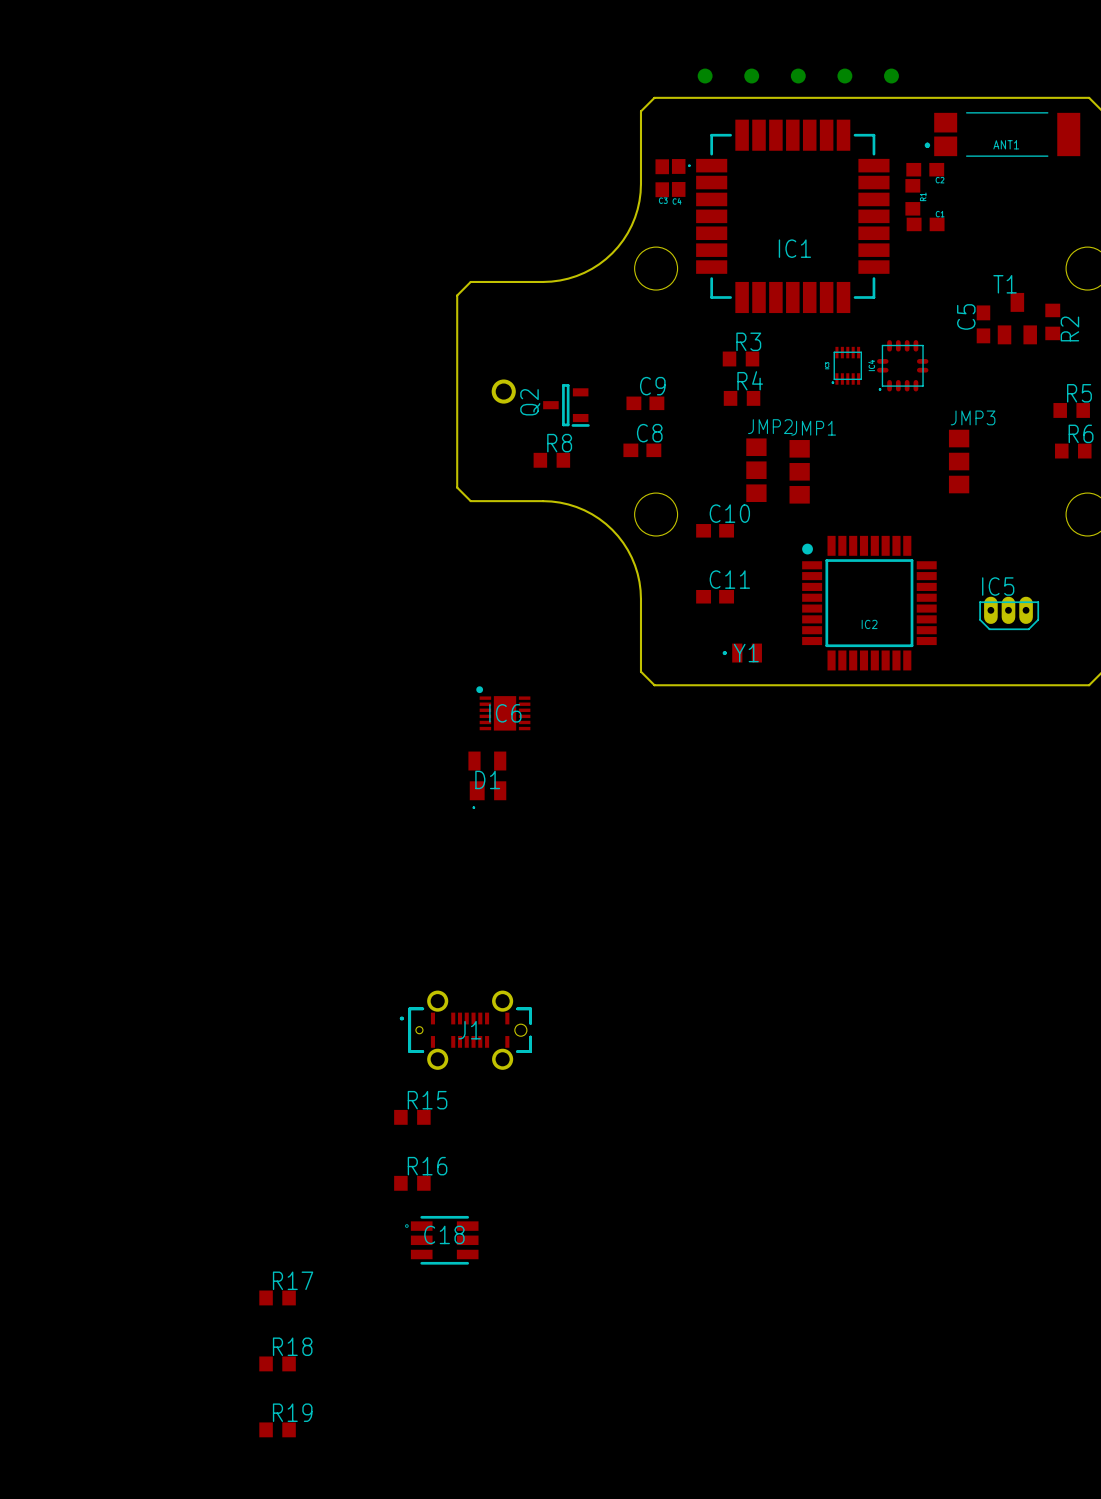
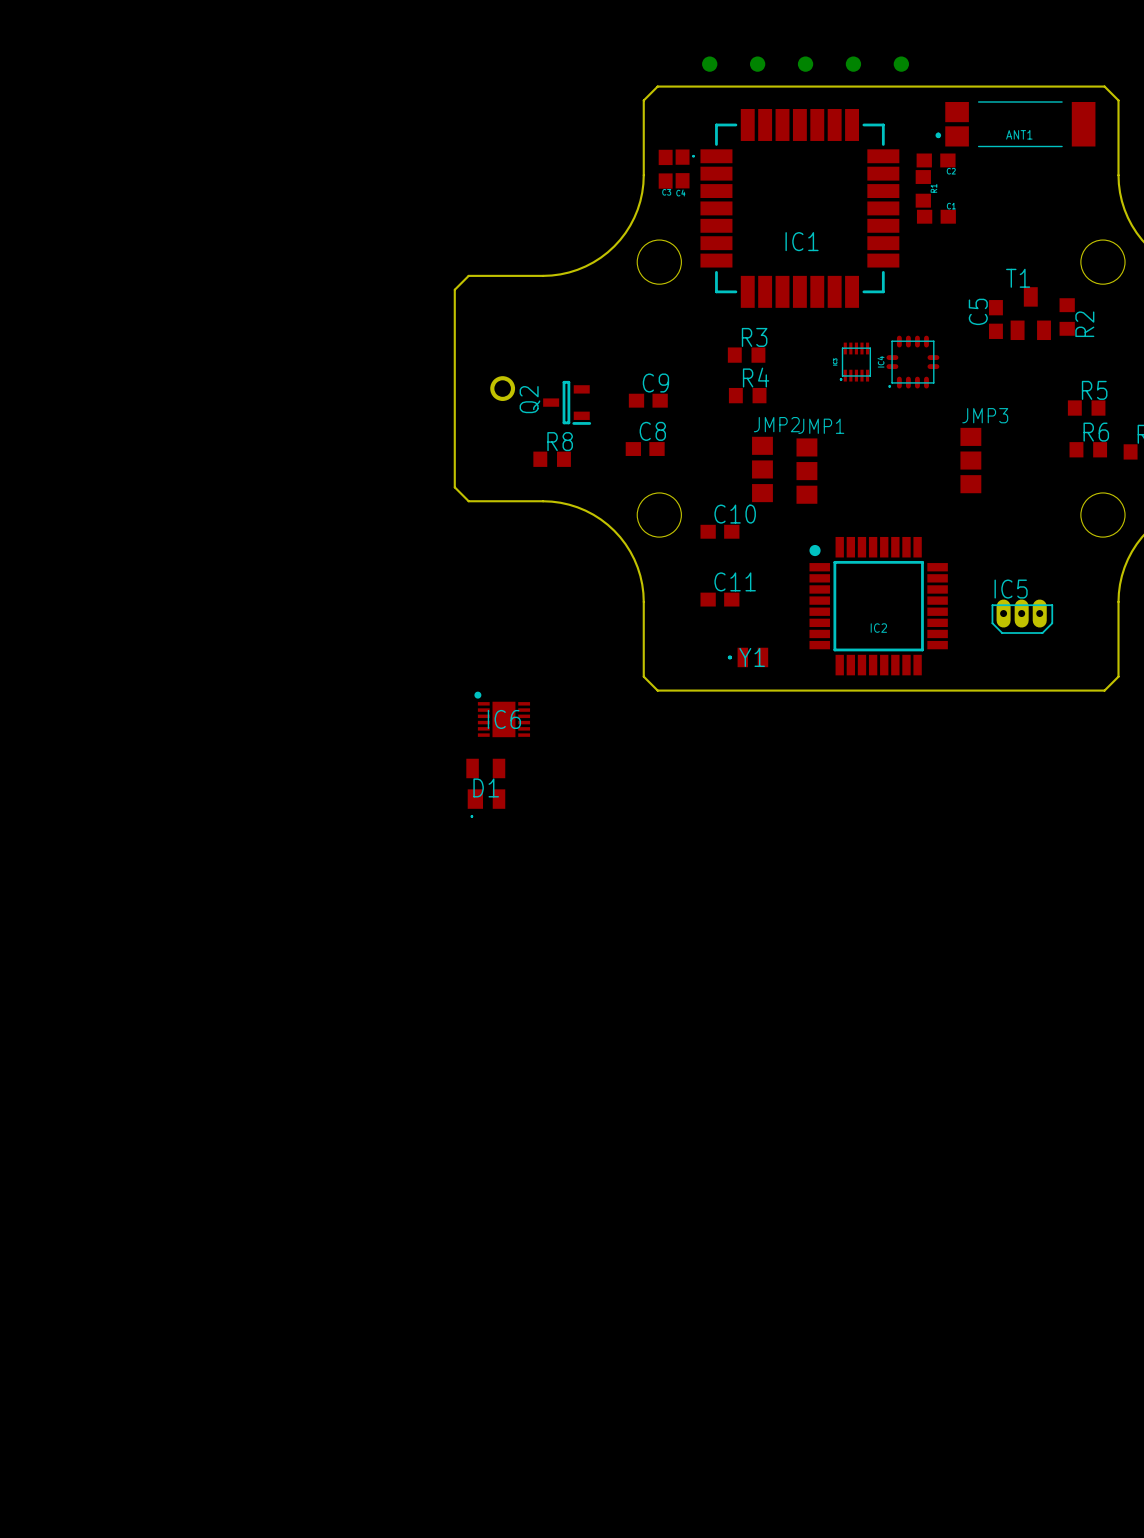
J1: (465, 1030) -> none
R15: (412, 1117) -> none
R16: (412, 1183) -> none
C18: (441, 1240) -> none
R17: (277, 1297) -> none
R18: (277, 1363) -> none
R19: (277, 1429) -> none

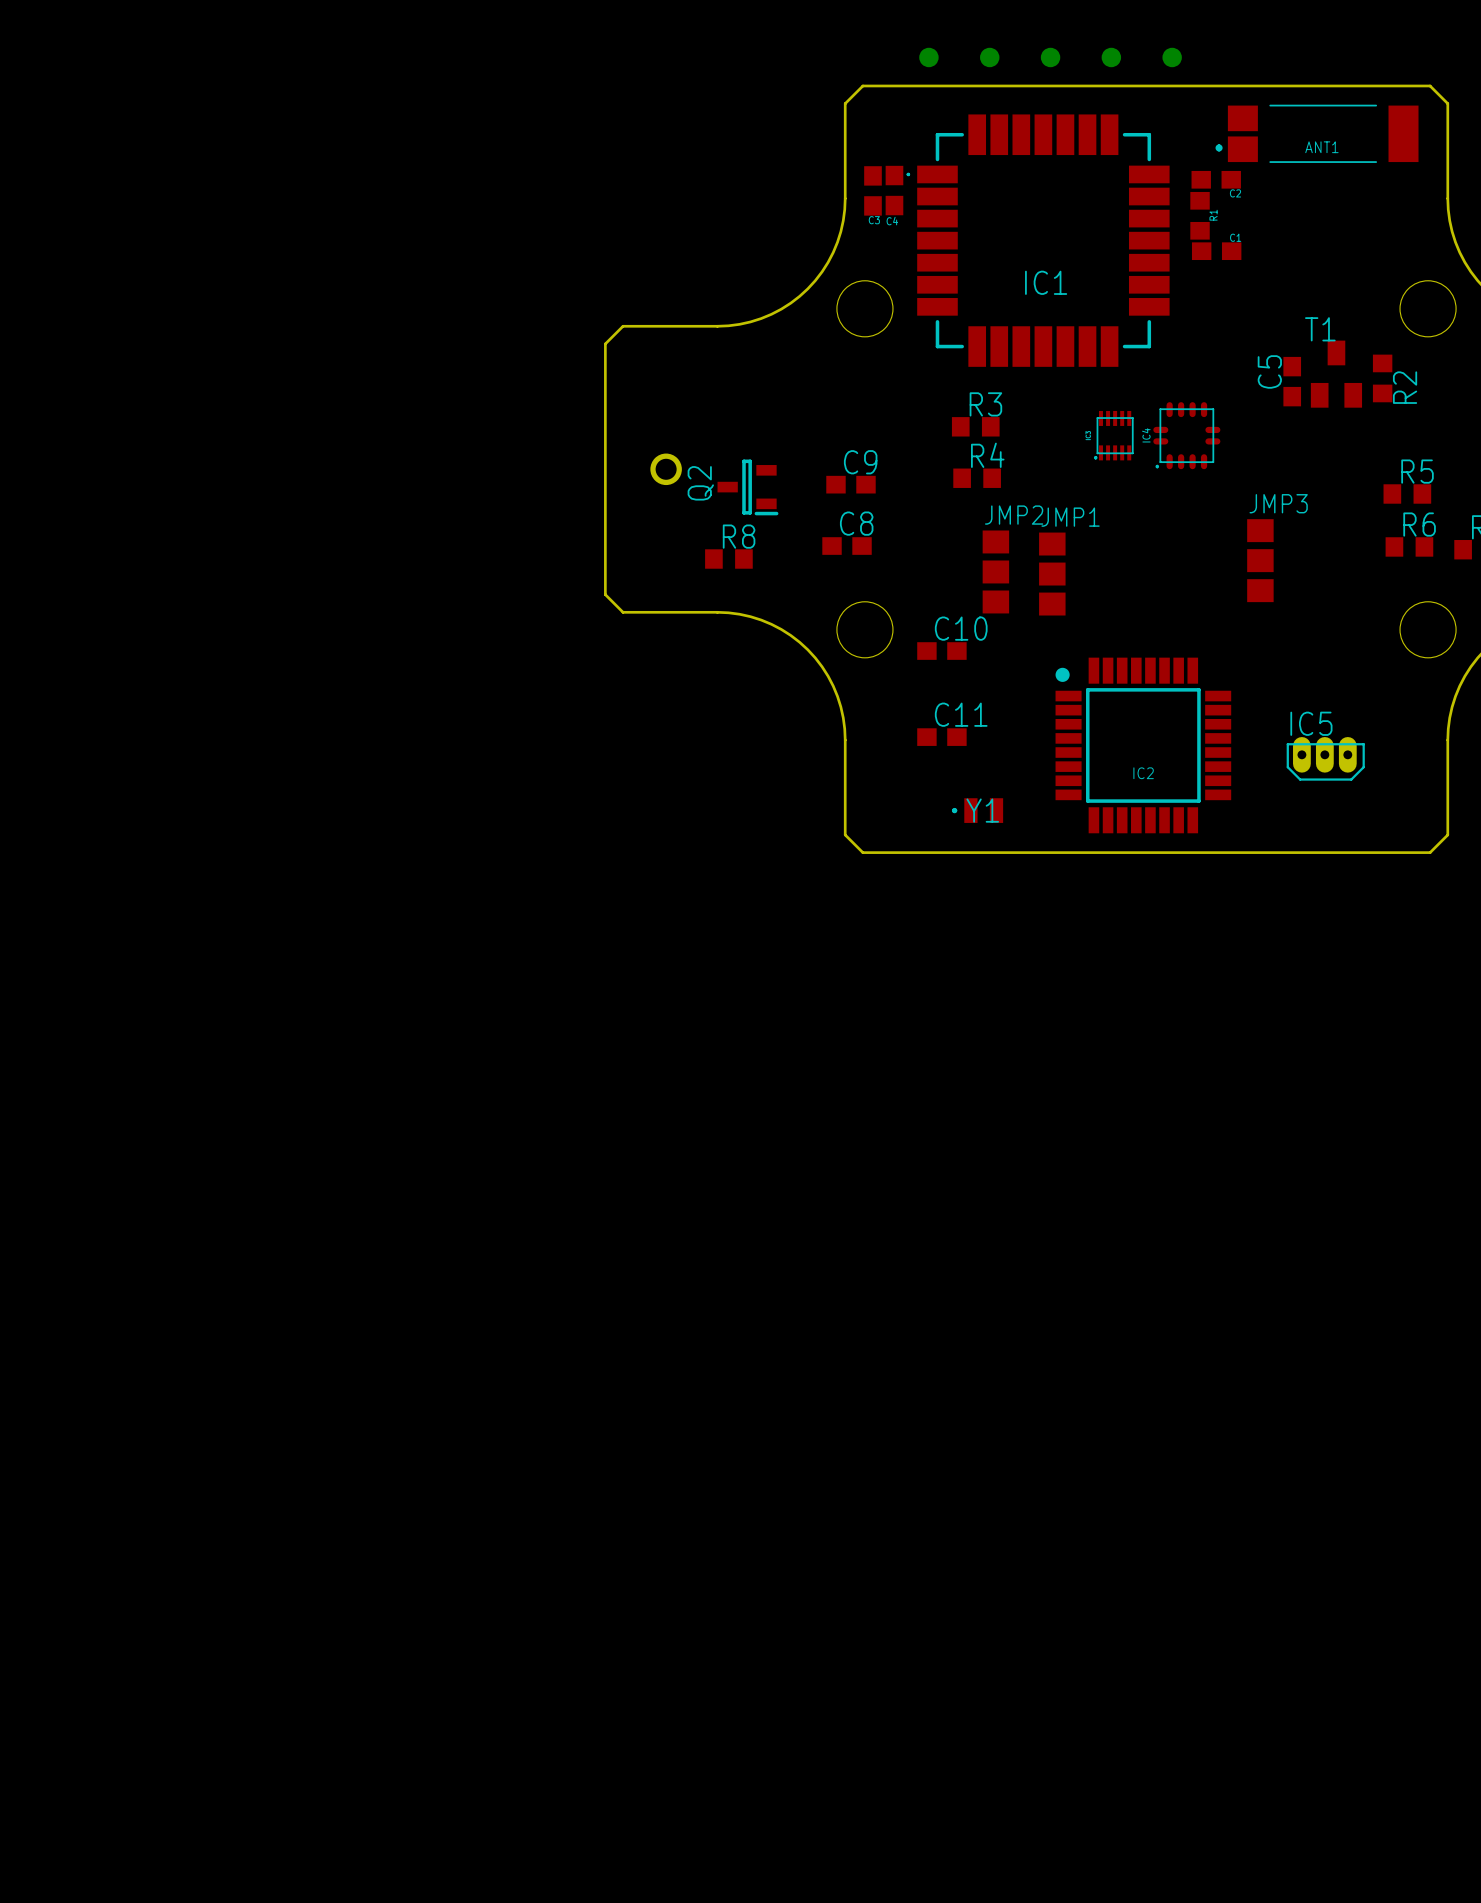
IC6: (502, 714) -> none
D1: (485, 788) -> none

